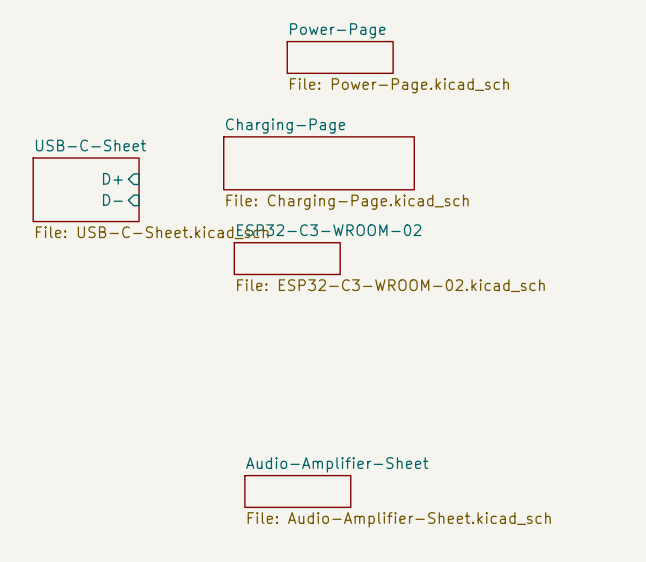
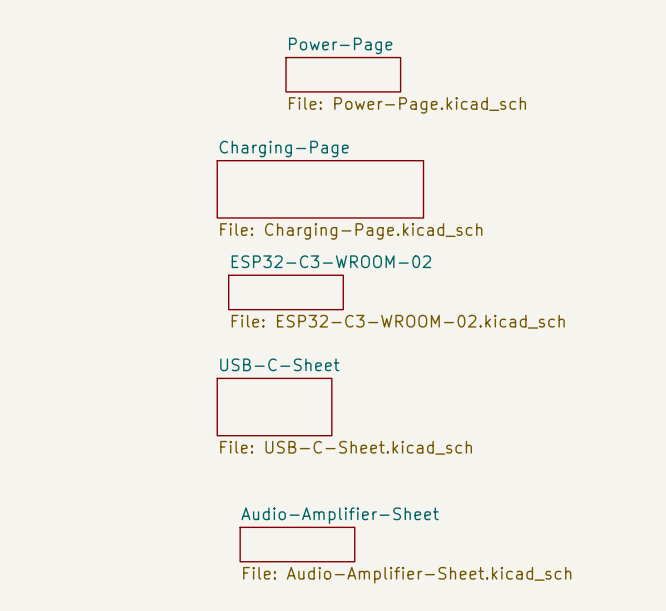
sheet pin: D+ (112, 178) -> none
sheet USB-C-Sheet: File: USB-C-Sheet.kicad_sch (86, 189) -> none
sheet pin: D- (112, 199) -> none
sheet USB-C-Sheet: none -> File: USB-C-Sheet.kicad_sch (274, 407)

